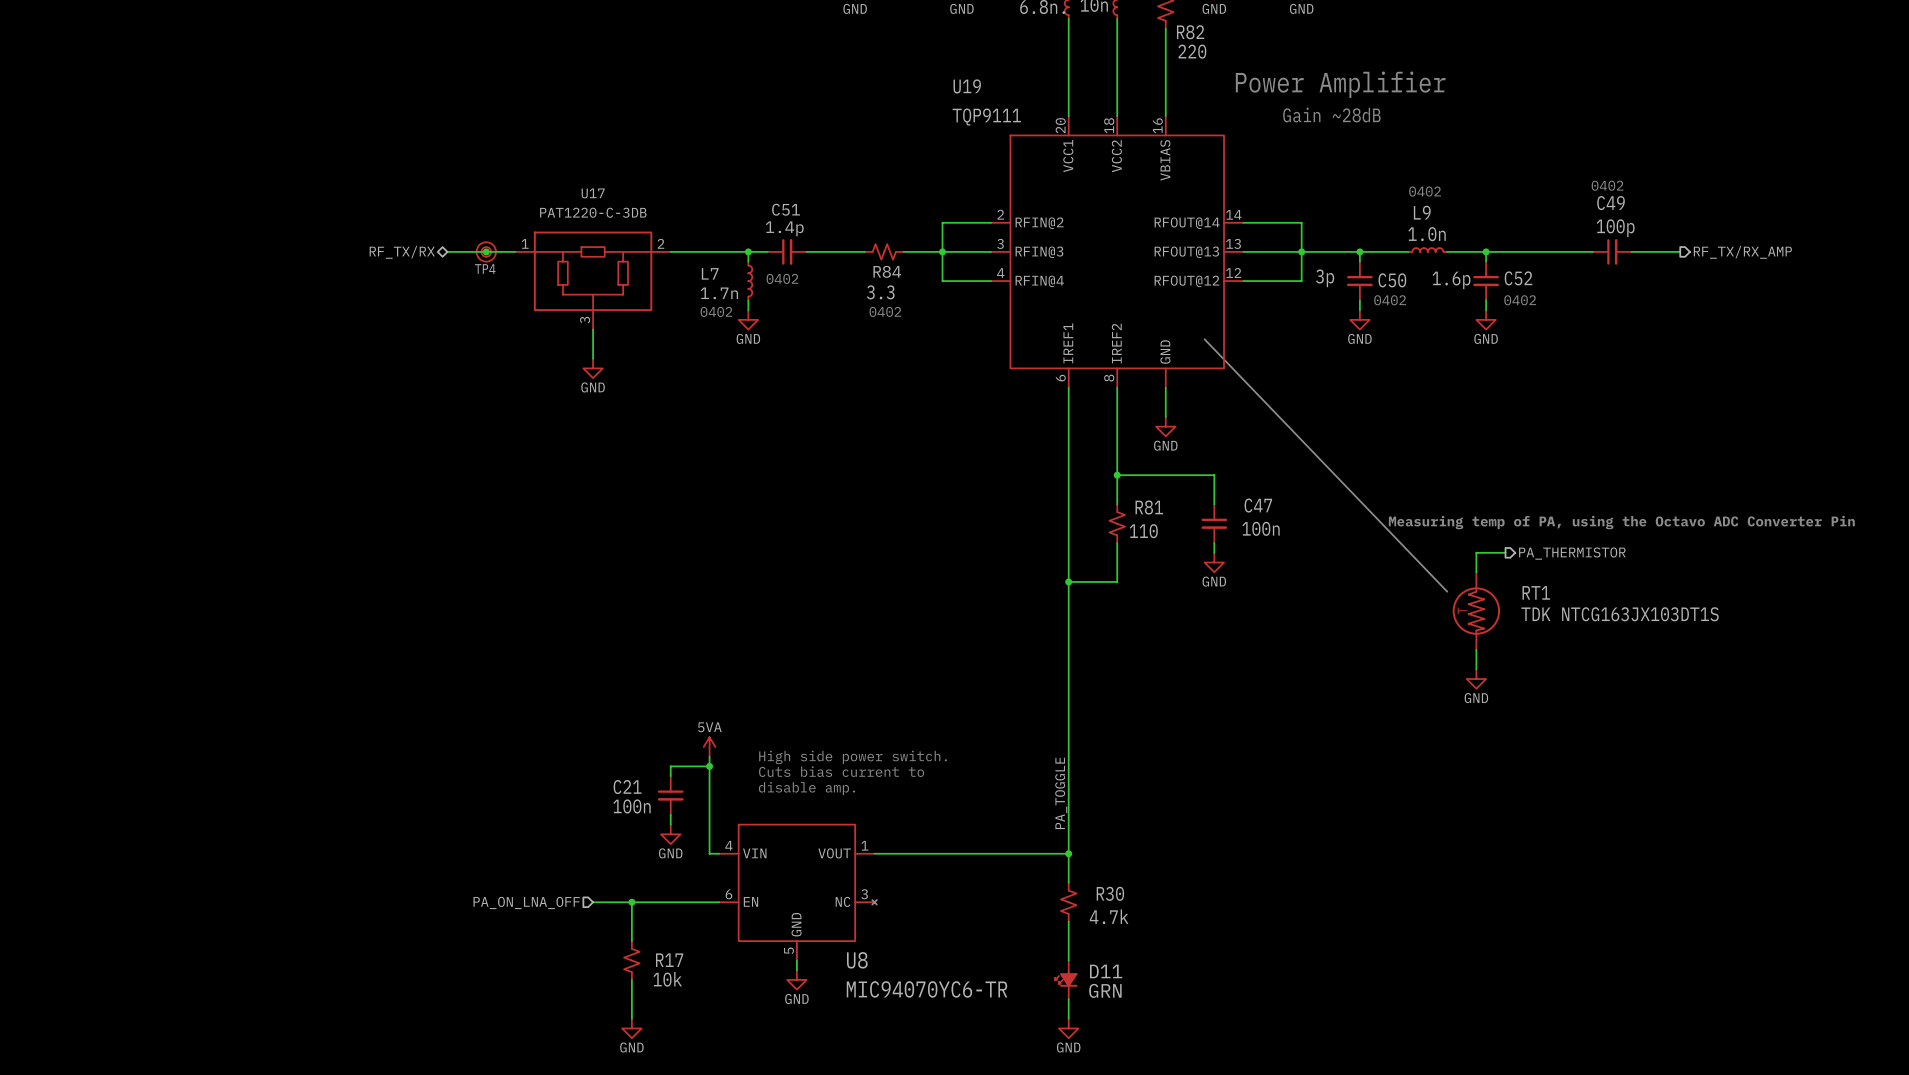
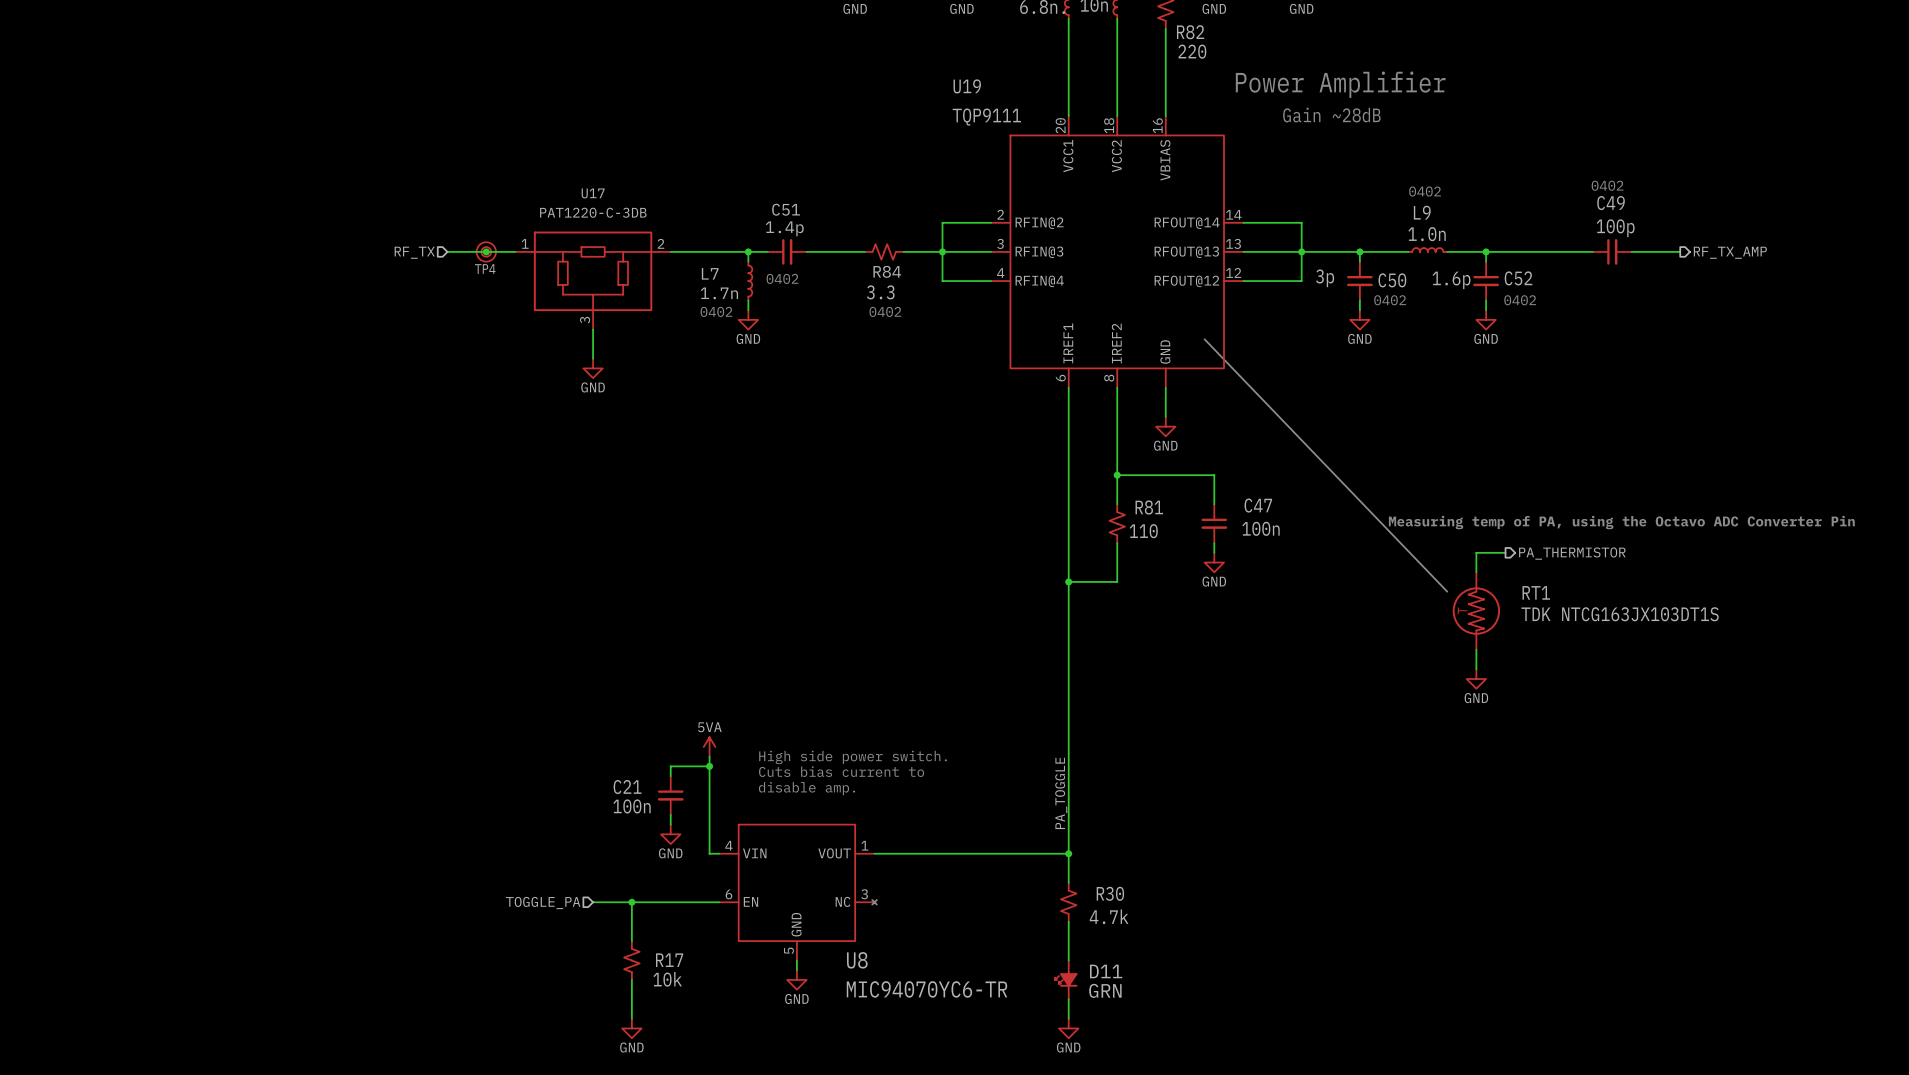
hierarchical label shape: bidirectional (402, 252) -> input (414, 252)
hierarchical label: RF_TX/RX (402, 252) -> RF_TX (414, 252)
hierarchical label: RF_TX/RX_AMP (1742, 252) -> RF_TX_AMP (1730, 252)
hierarchical label: PA_ON_LNA_OFF (526, 903) -> TOGGLE_PA (543, 903)

